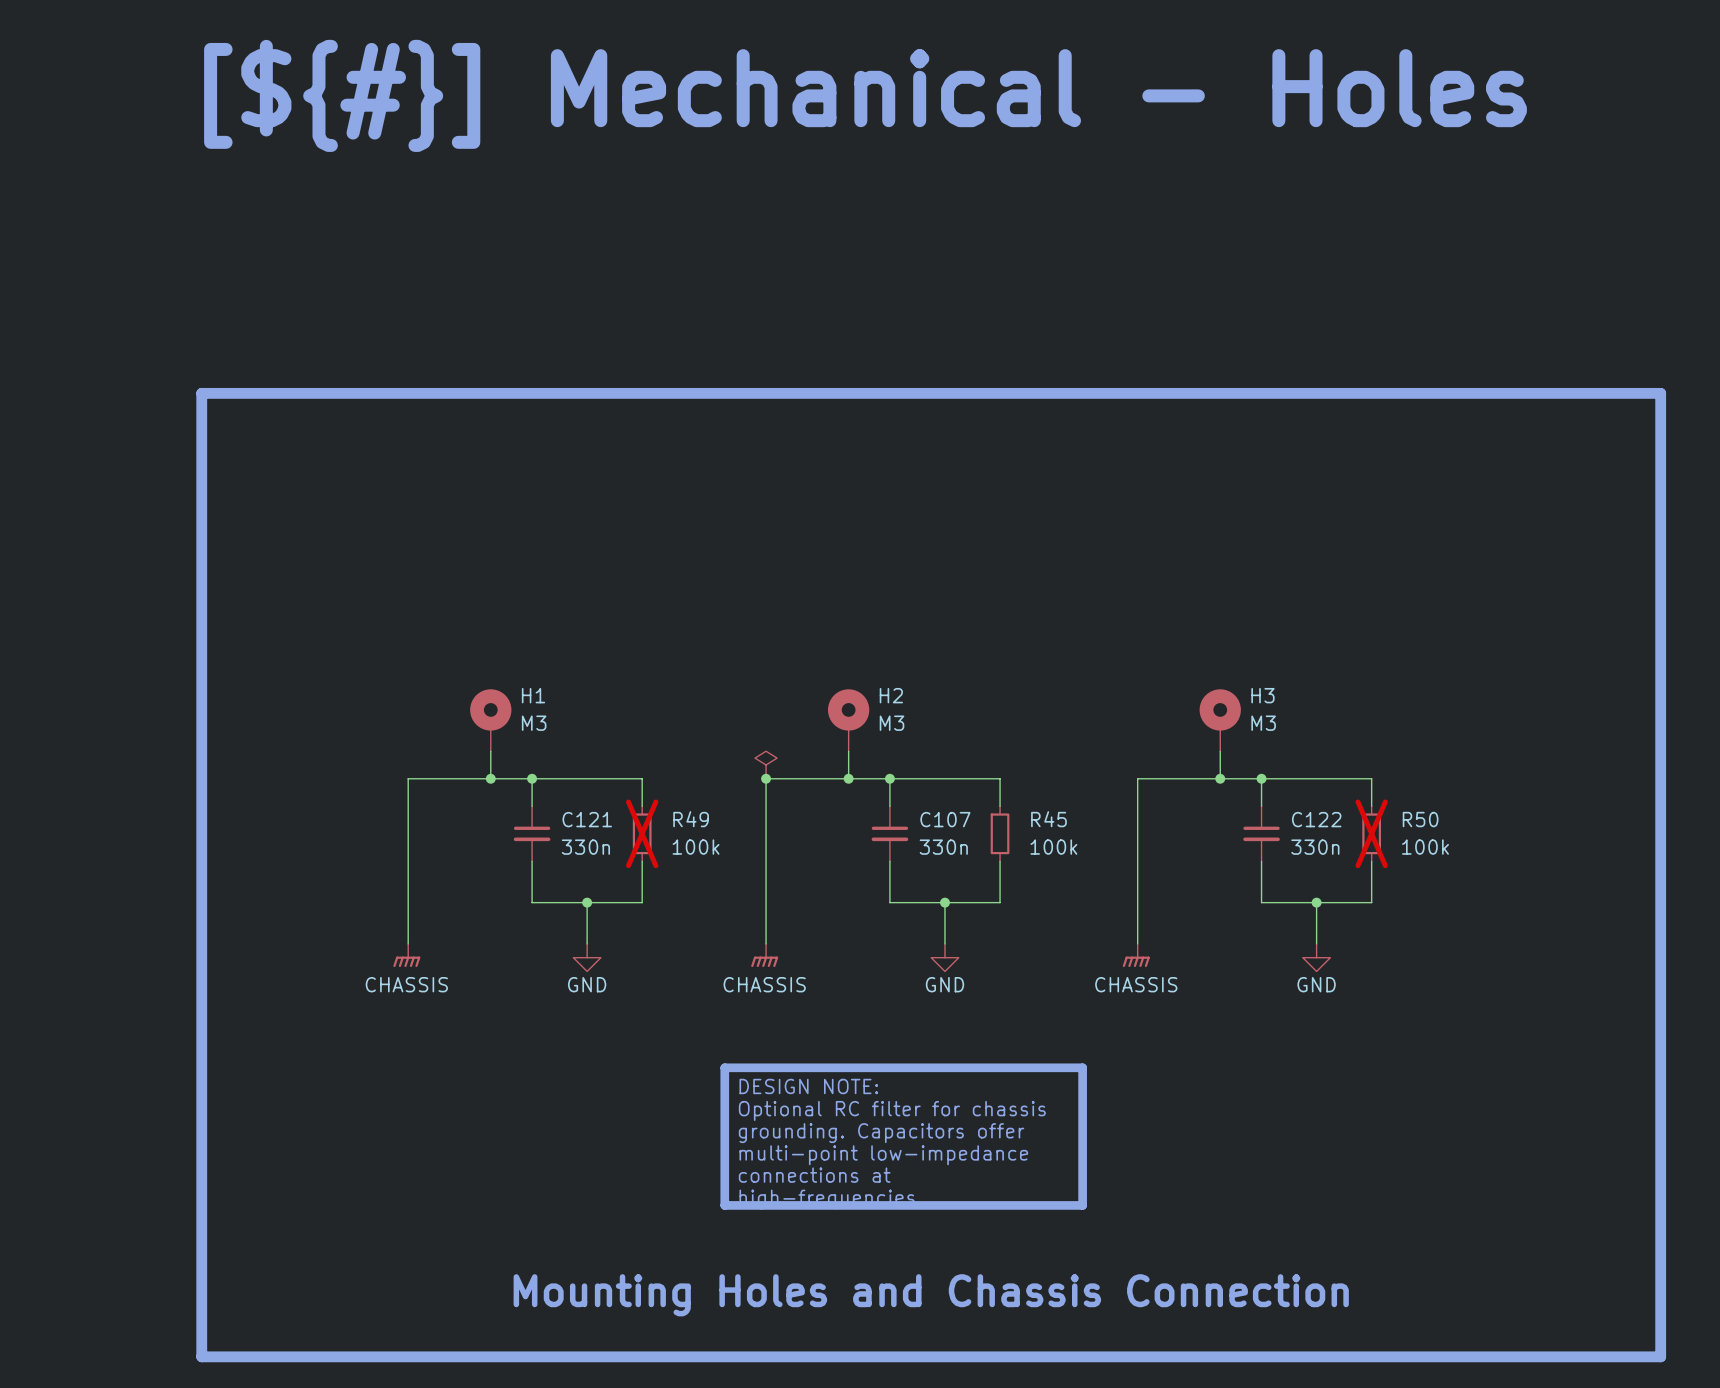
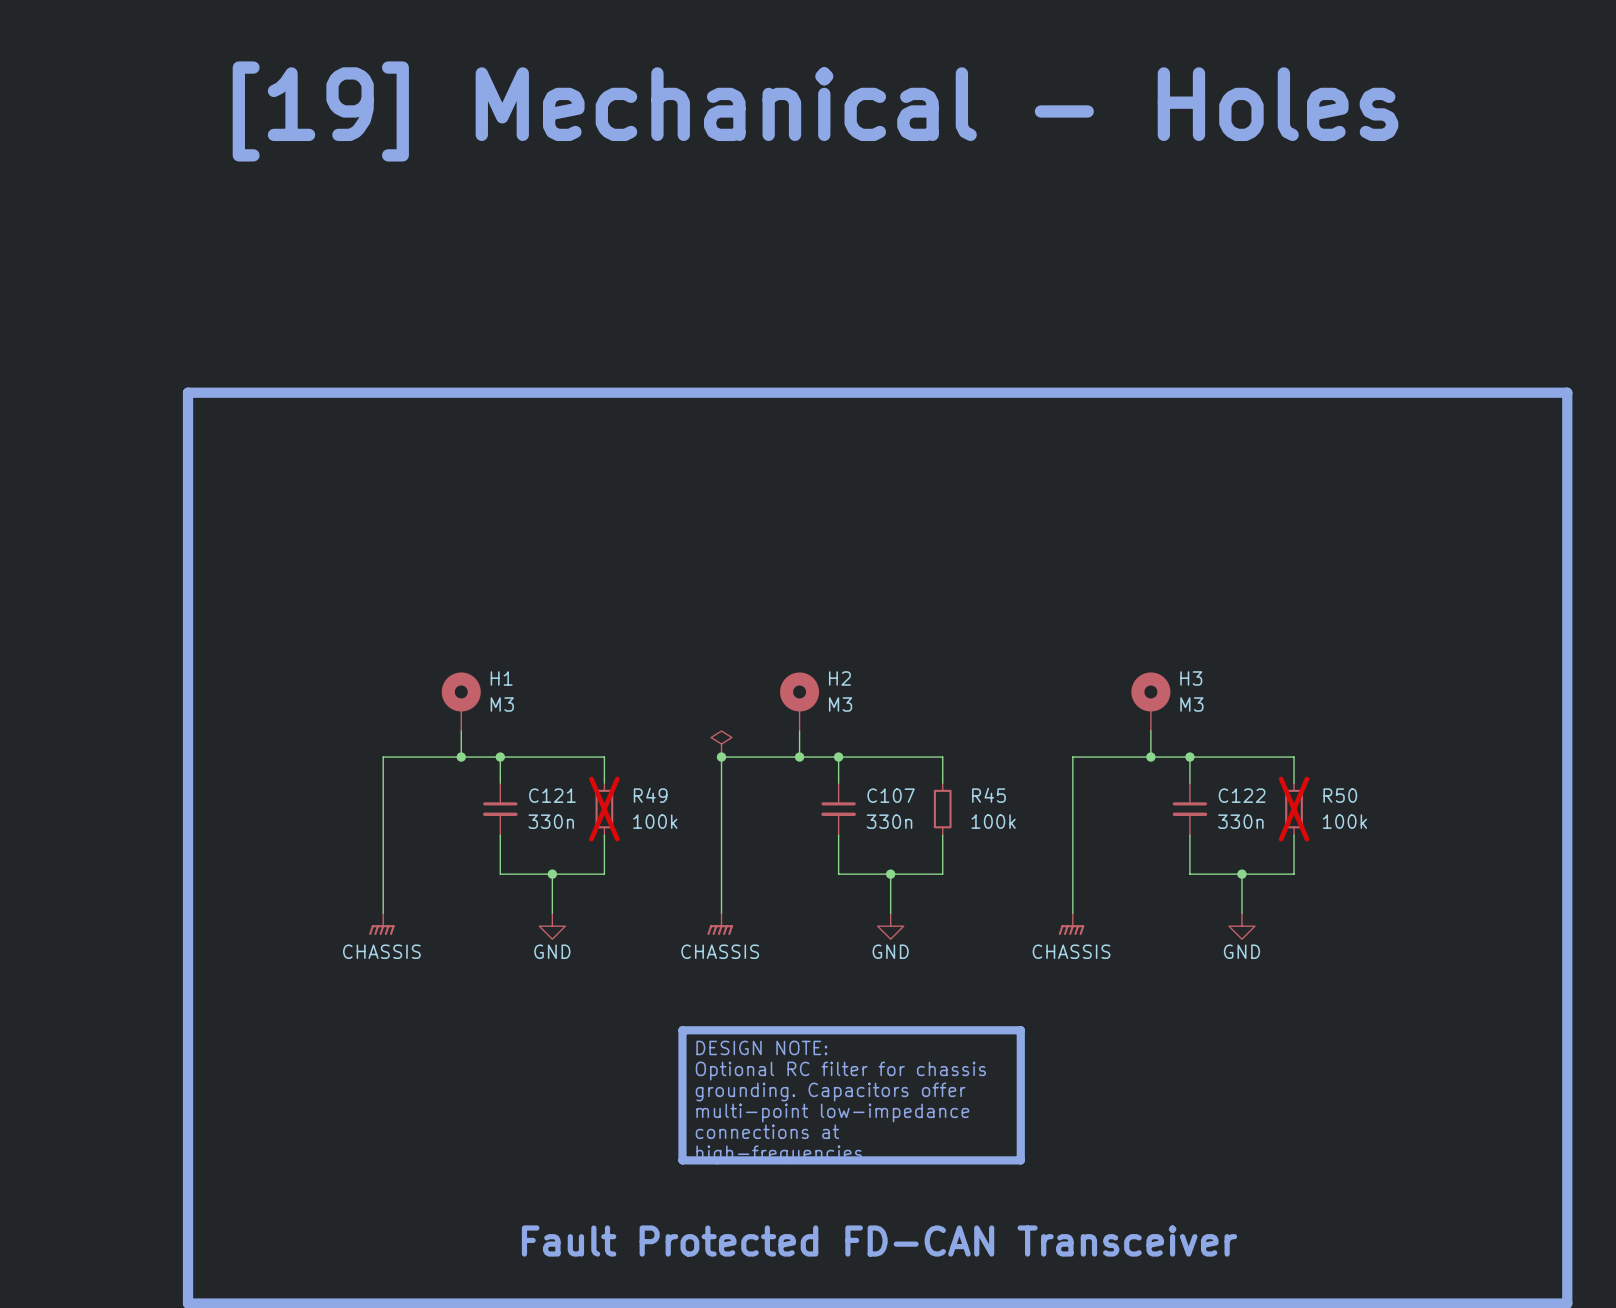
text: [${#}] Mechanical - Holes (865, 95) -> [19] Mechanical - Holes (815, 111)
text: Mounting Holes and Chassis Connection (931, 1295) -> Fault Protected FD-CAN Transceiver (879, 1241)

